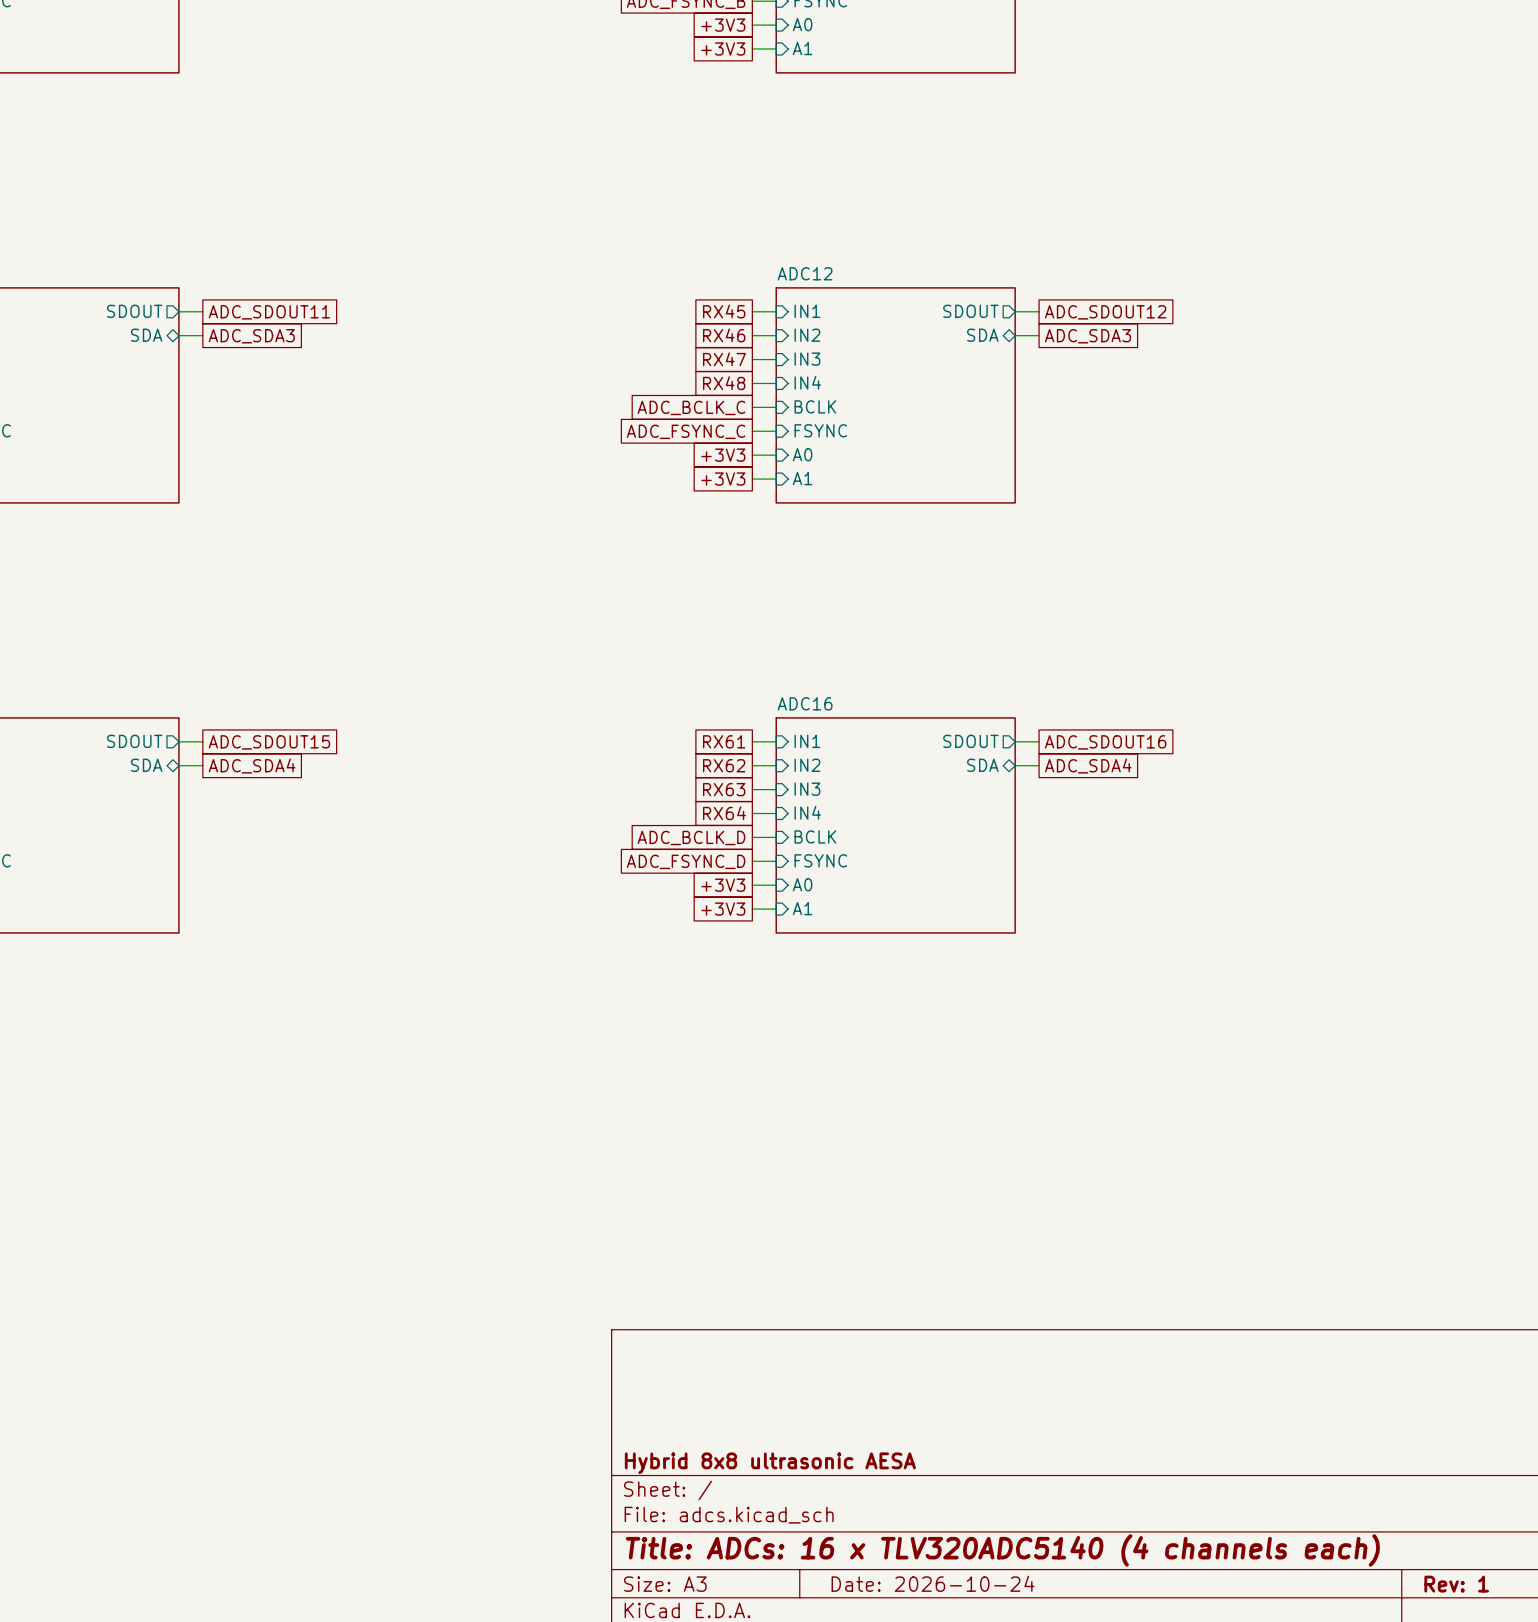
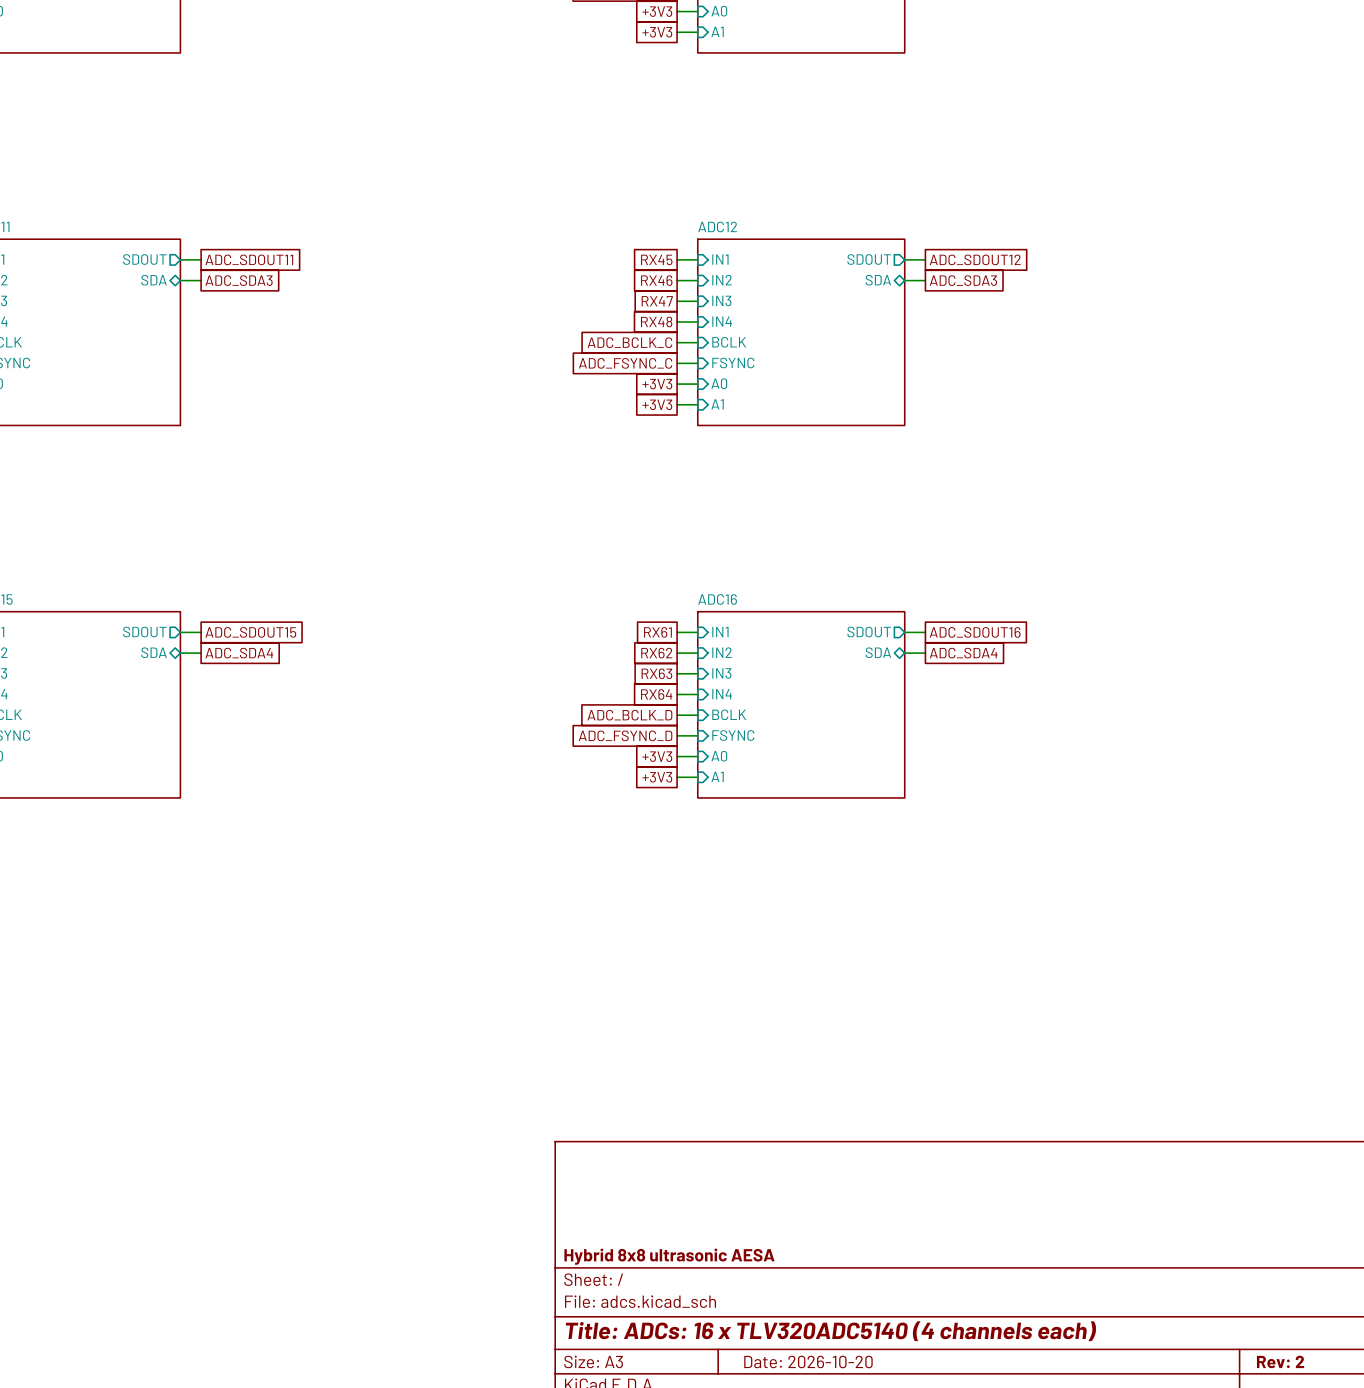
title block: Date: 2026-10-24 (933, 1583) -> Date: 2026-10-20 (808, 1361)
title block: Rev: 1 (1456, 1584) -> Rev: 2 (1280, 1361)

